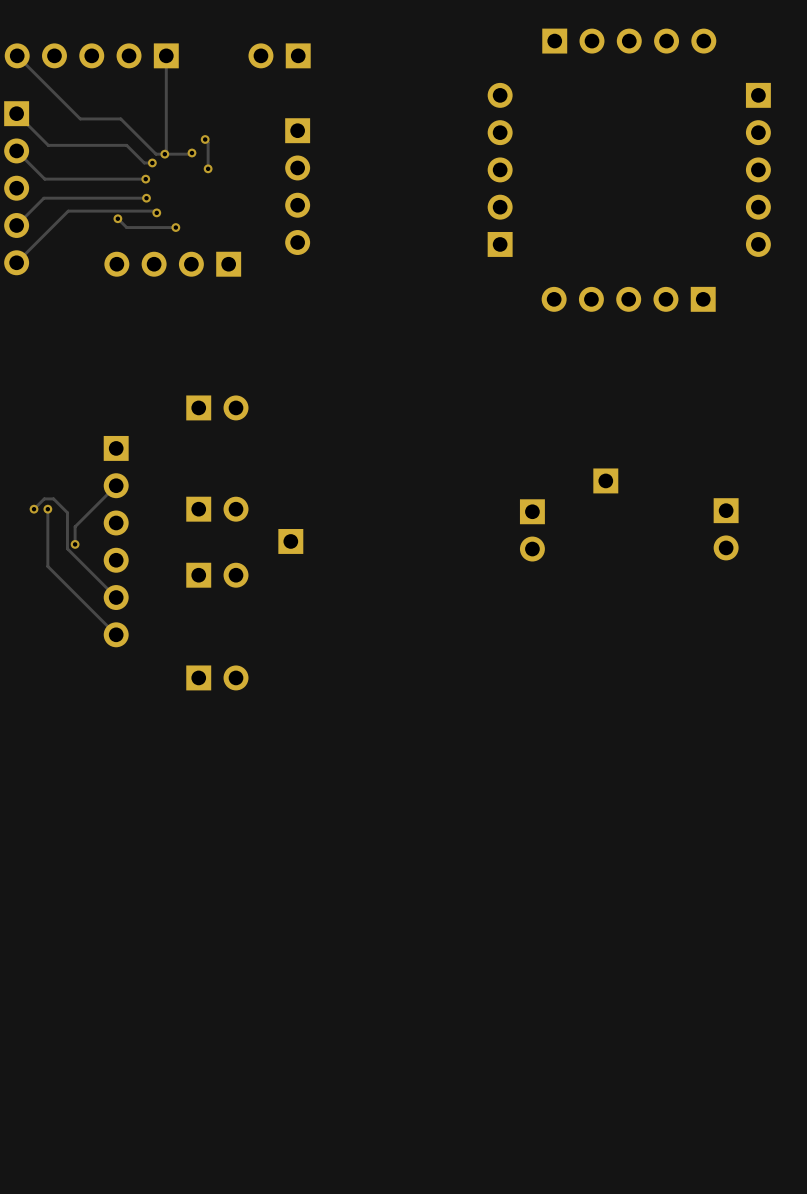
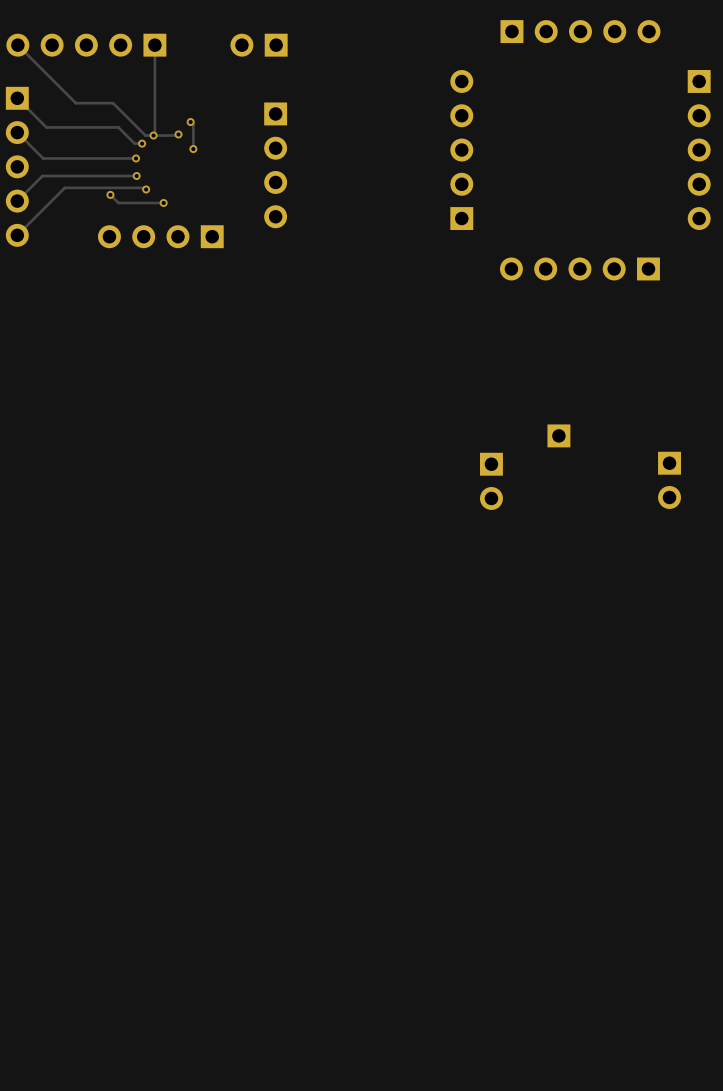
part: (217, 407) -> none
track: (116, 485) (75, 526) (75, 544) -> none
track: (34, 509) (44, 498) (53, 498) (67, 512) (67, 548) (116, 597) -> none
via: (34, 509) -> none
track: (47, 509) (47, 566) (116, 634) -> none
via: (47, 509) -> none
part: (217, 509) -> none
part: (116, 541) -> none
part: (290, 541) -> none
via: (75, 544) -> none
part: (217, 575) -> none
part: (217, 677) -> none

